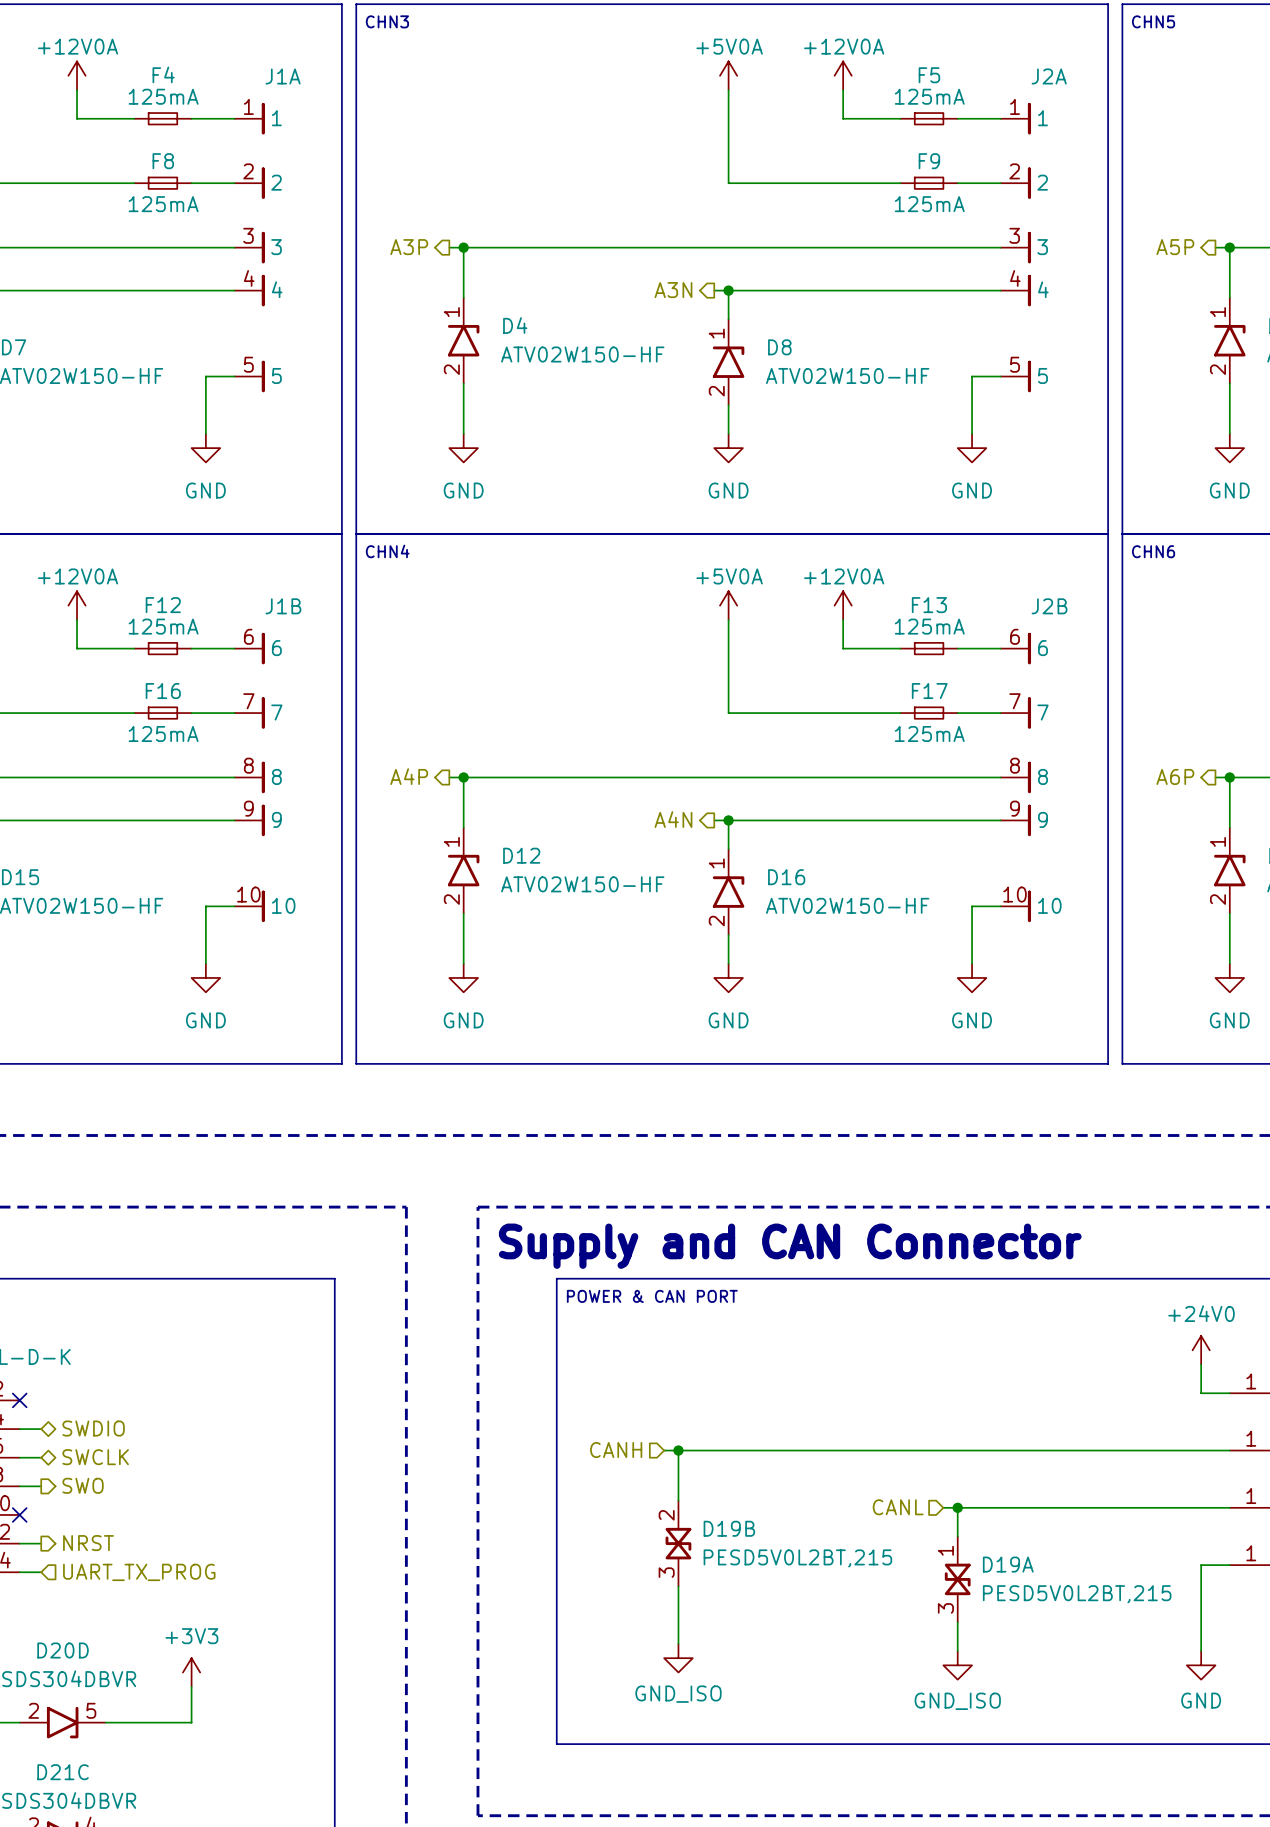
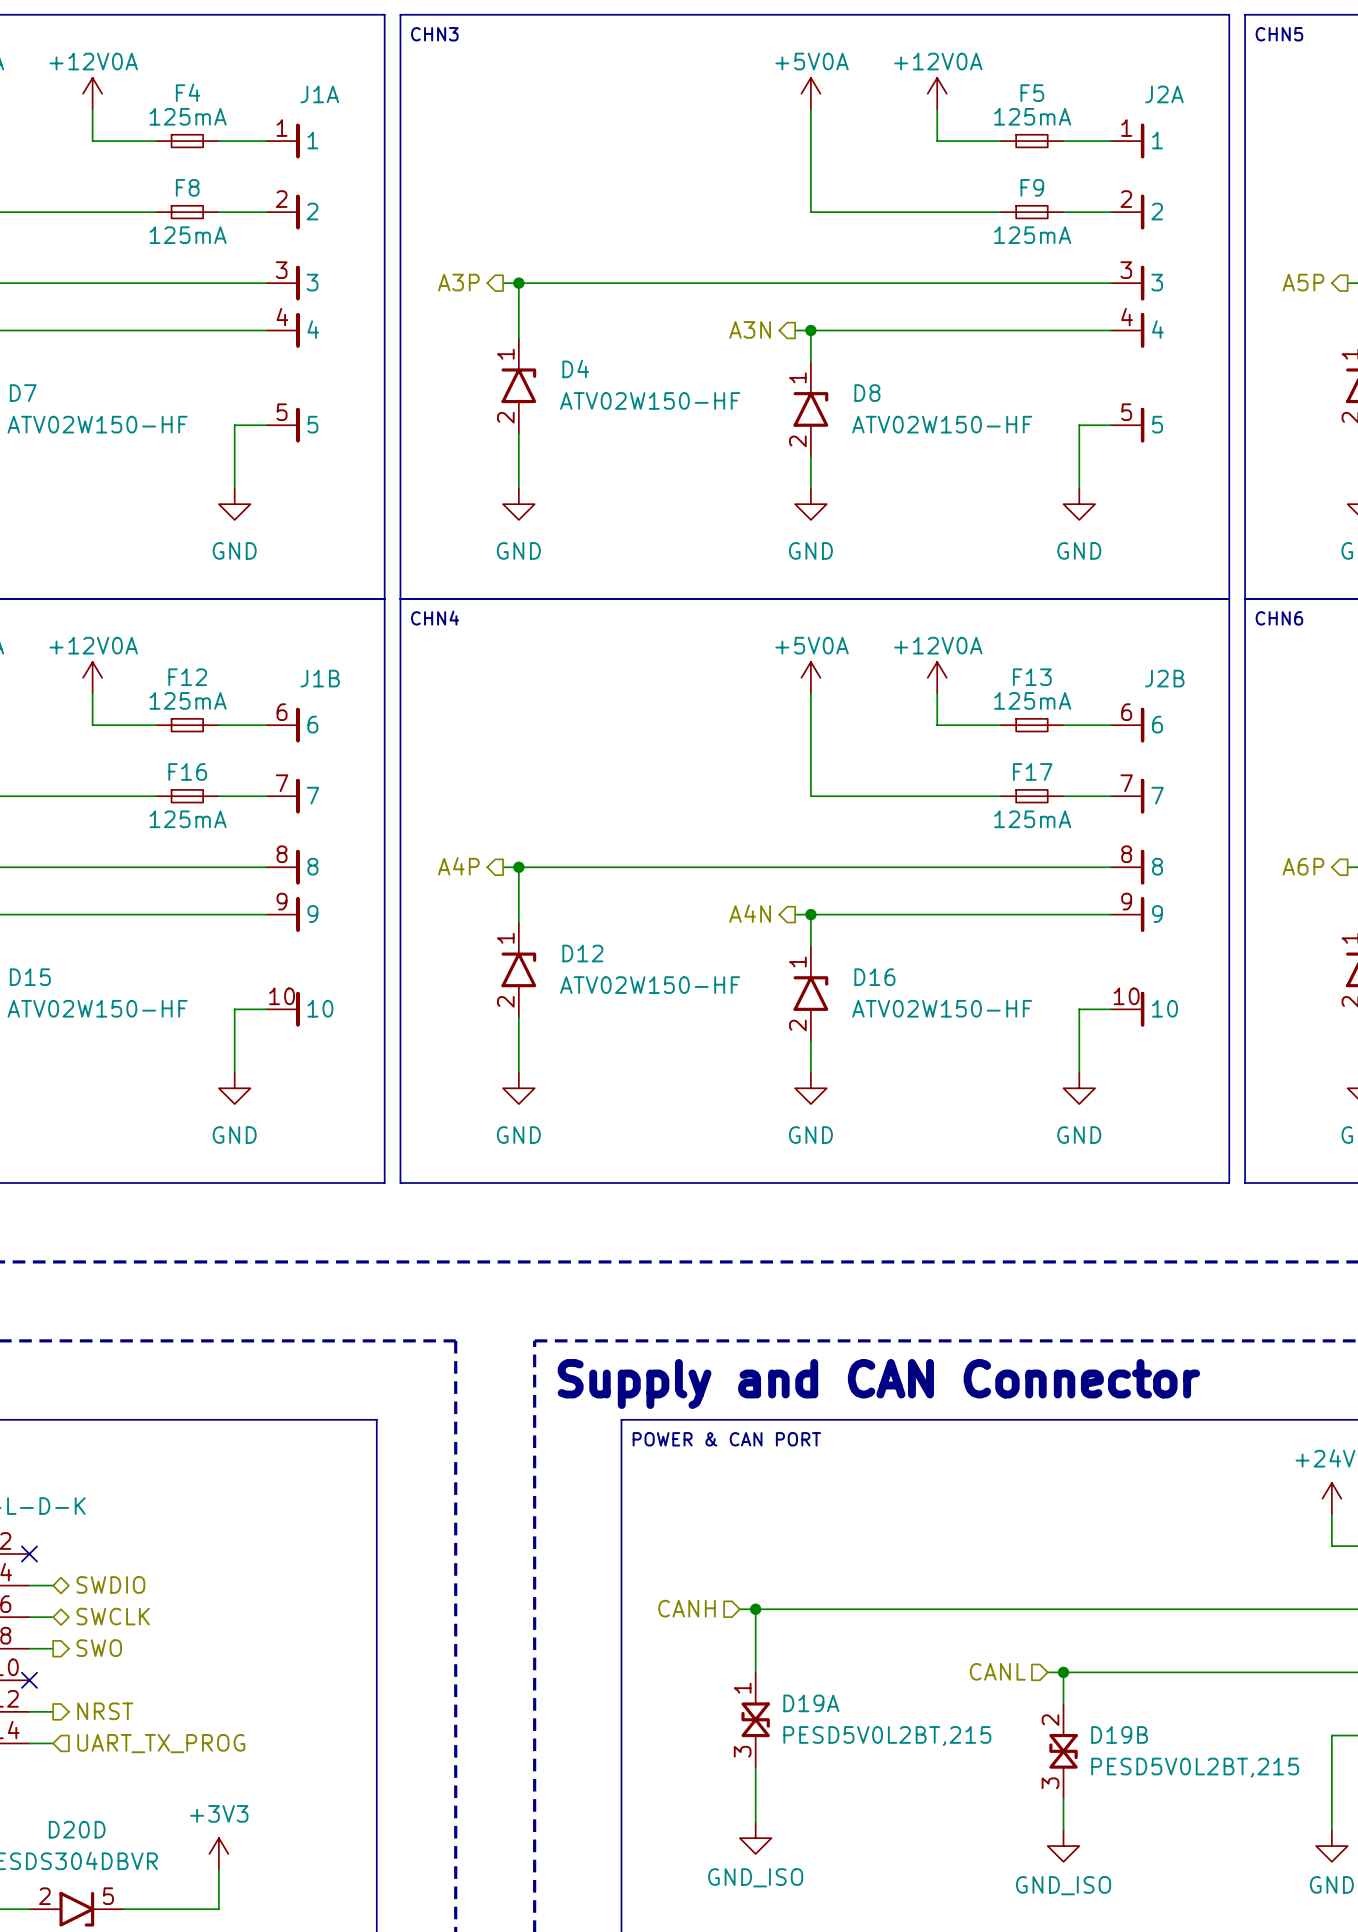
D19B position: (678, 1543) -> (1063, 1751)
D19A position: (957, 1579) -> (755, 1719)

